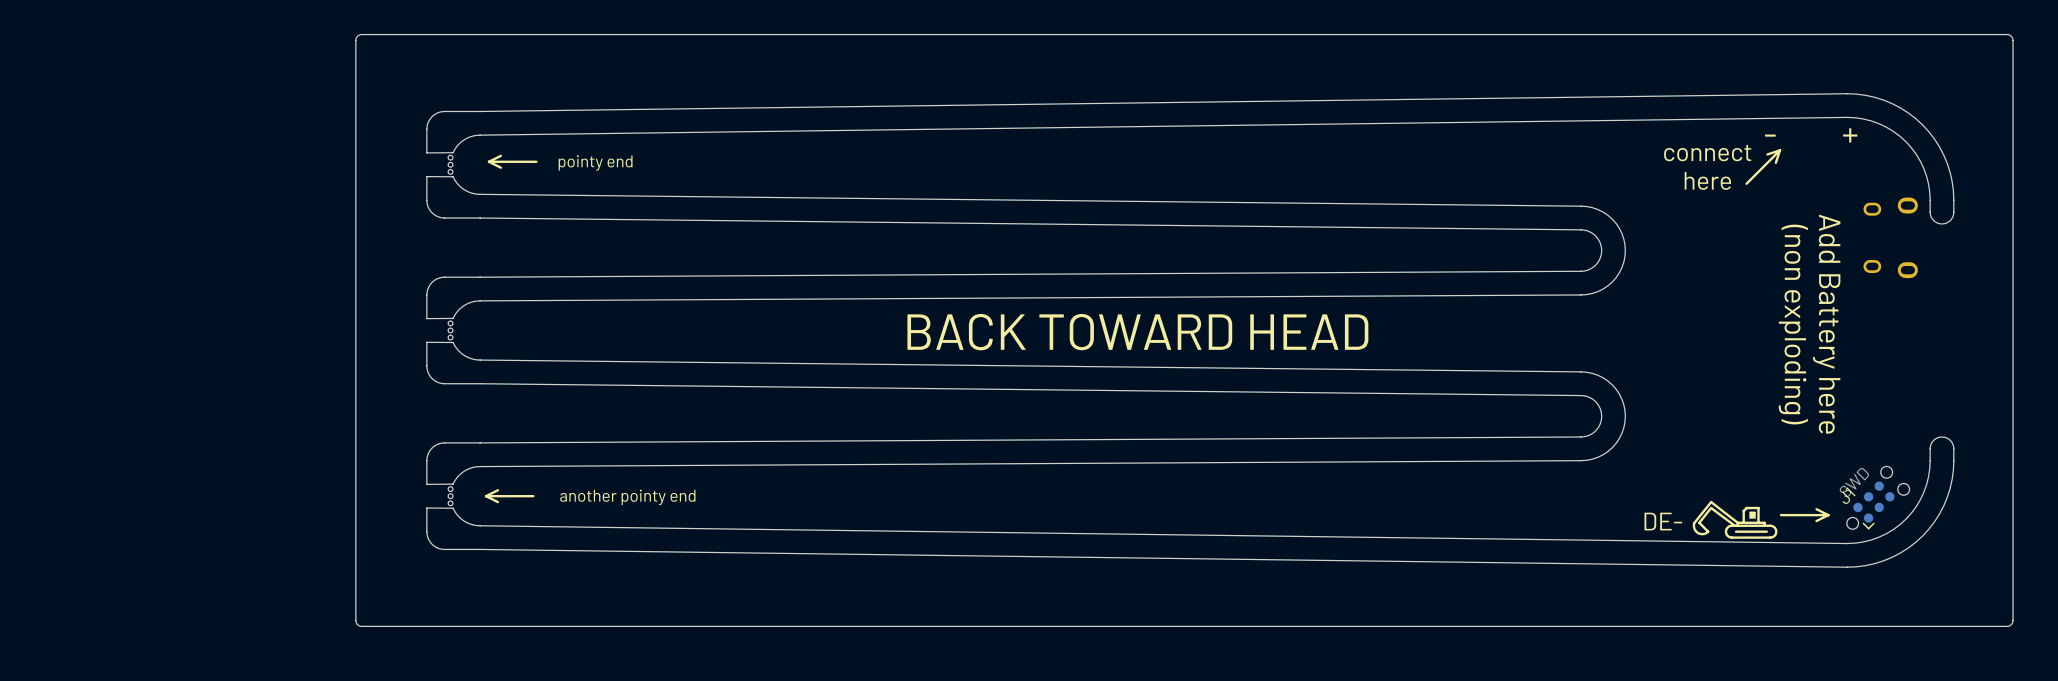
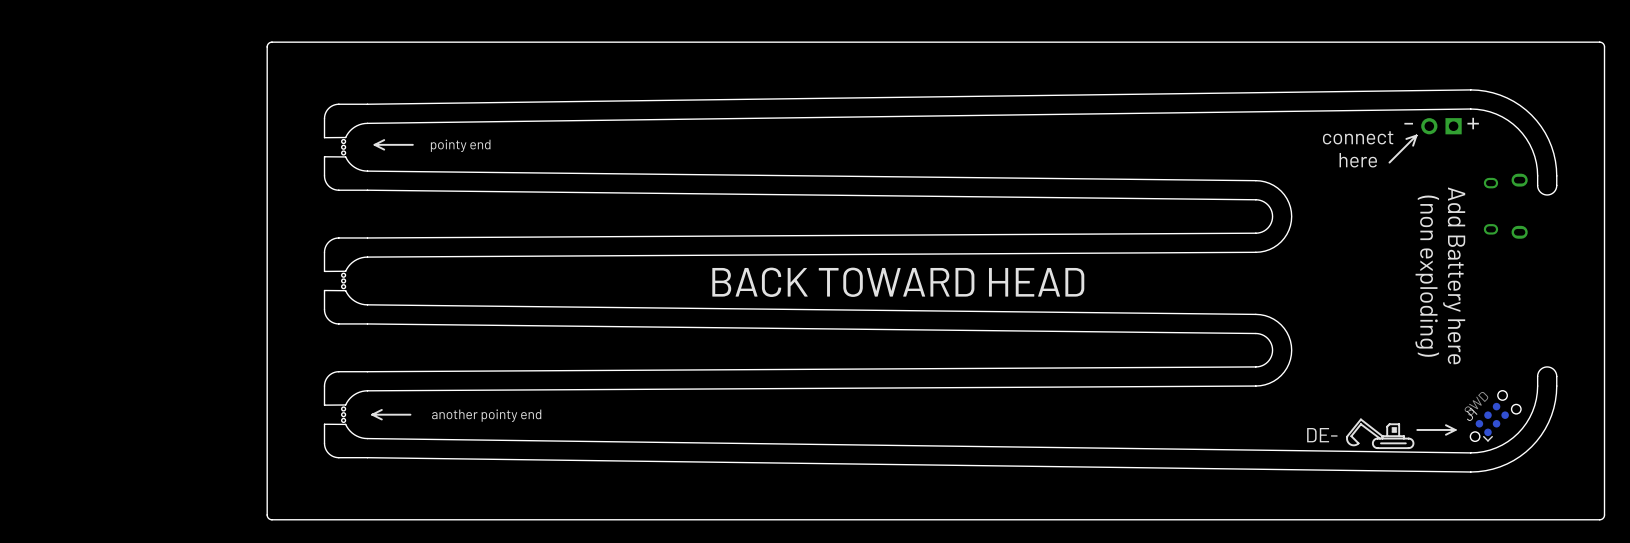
part: none -> (1441, 126)

